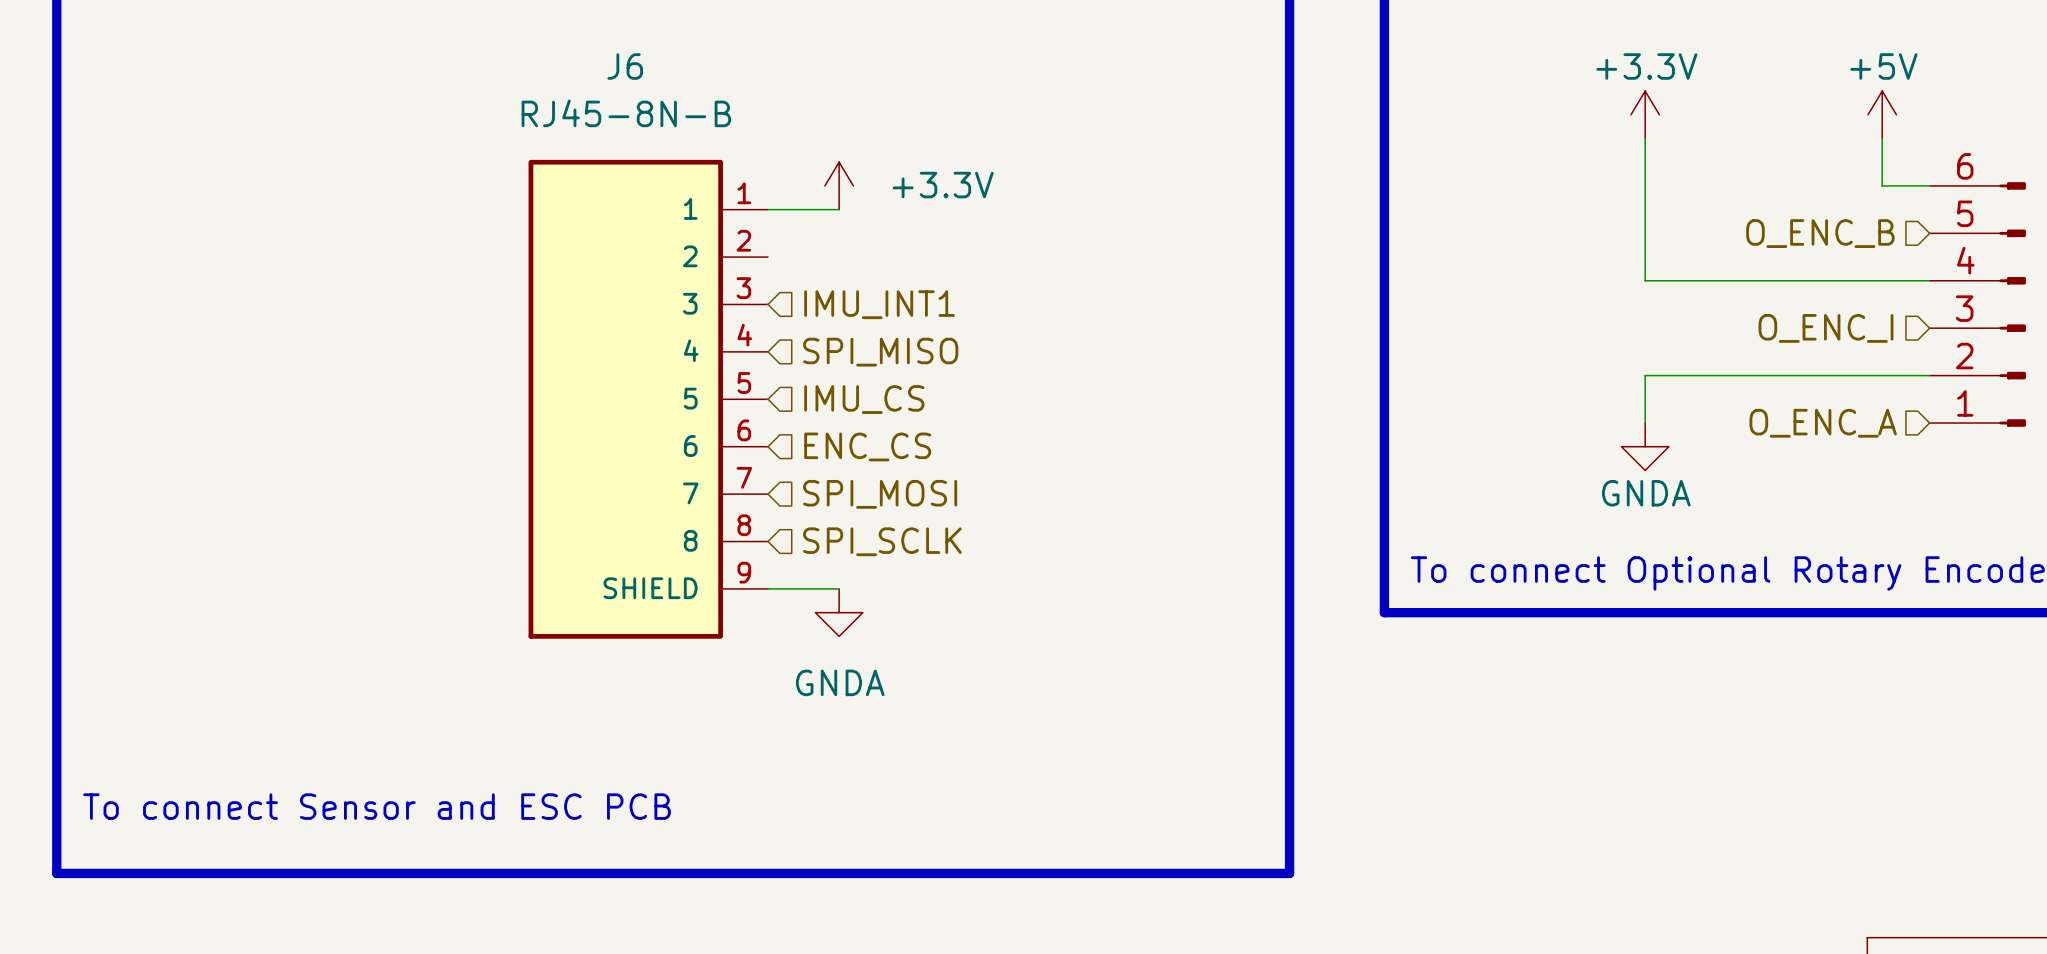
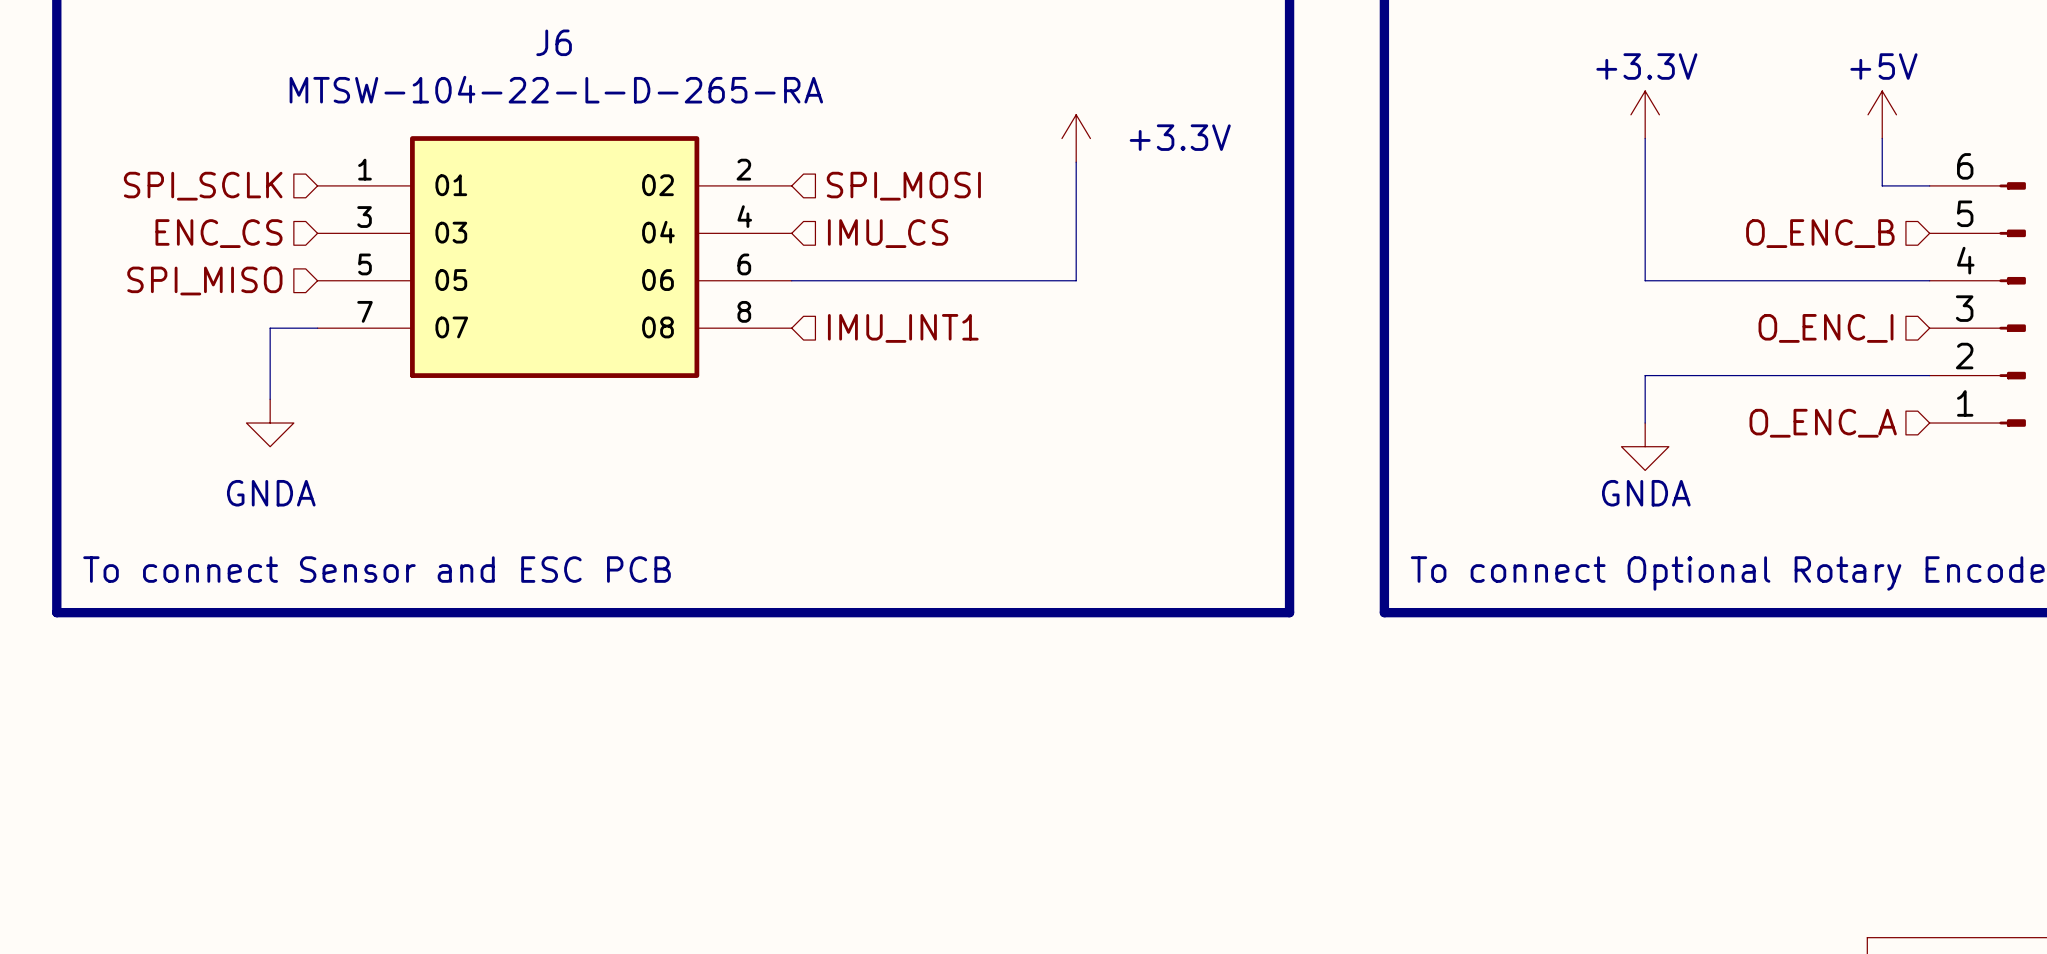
J6 name position: J6 (625, 66) -> J6 (554, 42)
J6 value: RJ45-8N-B (626, 113) -> MTSW-104-22-L-D-265-RA (556, 89)
J6 symbol: [528, 159, 769, 639] -> [317, 136, 792, 378]
wire: none -> (1076, 162) (1076, 280) (791, 280)
power symbol position: +3.3V (839, 185) -> +3.3V (1076, 138)
hierarchical label: none -> SPI_SCLK (203, 186)
wire: (768, 209) (839, 209) -> none
hierarchical label: none -> ENC_CS (218, 233)
hierarchical label: none -> SPI_MISO (204, 281)
hierarchical label position: IMU_INT1 (879, 304) -> IMU_INT1 (903, 328)
wire: none -> (317, 328) (270, 328) (270, 399)
hierarchical label: SPI_MISO (880, 352) -> none
hierarchical label position: IMU_CS (864, 399) -> IMU_CS (888, 233)
power symbol: none -> GNDA (270, 423)
hierarchical label: ENC_CS (867, 446) -> none
hierarchical label position: SPI_MOSI (880, 494) -> SPI_MOSI (903, 186)
hierarchical label: SPI_SCLK (882, 541) -> none
wire: (768, 588) (839, 588) -> none
line: (56, 612) (56, 873) (1289, 873) (1289, 612) -> (56, 612) (1289, 612)
power symbol: GNDA (839, 612) -> none
text position: To connect Sensor and ESC PCB (377, 806) -> To connect Sensor and ESC PCB (377, 569)

